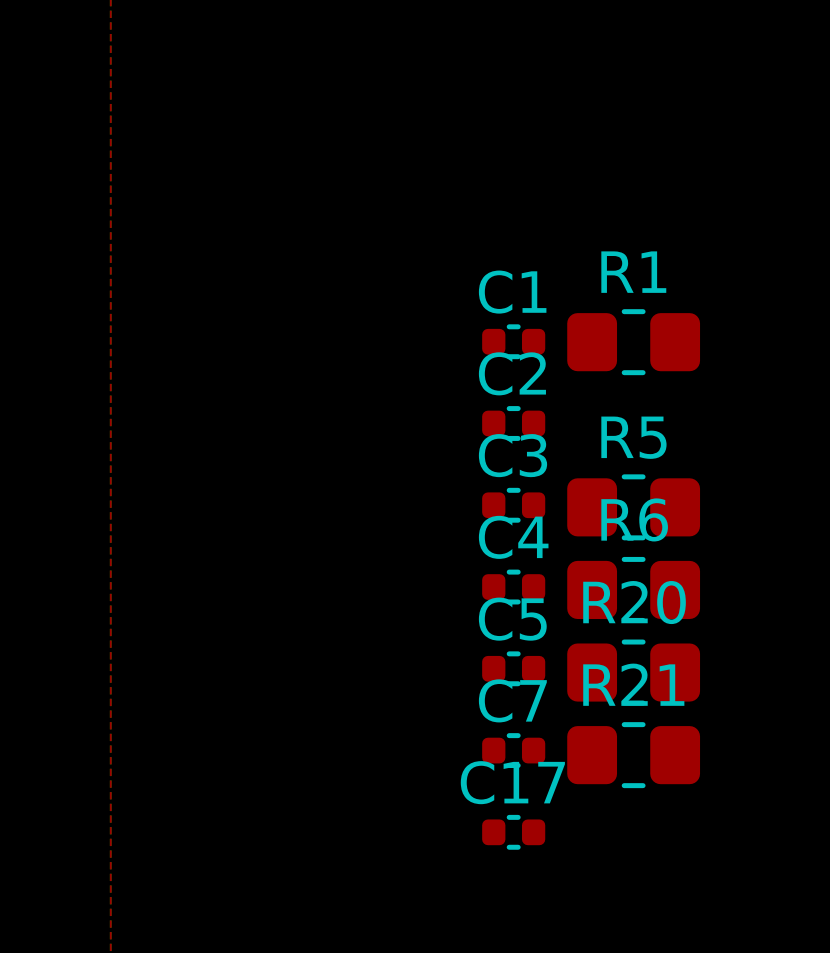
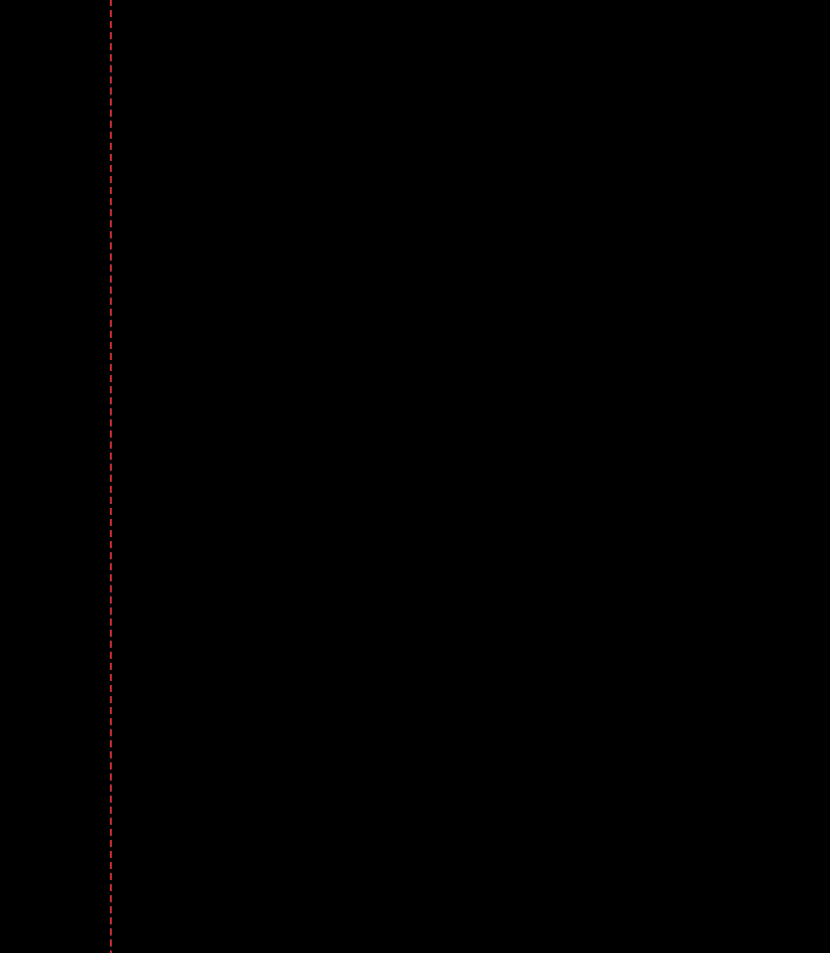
C1: (513, 341) -> none
R1: (633, 342) -> none
C2: (513, 423) -> none
C3: (513, 505) -> none
R5: (633, 507) -> none
C4: (513, 587) -> none
R6: (633, 589) -> none
C5: (513, 668) -> none
R20: (633, 672) -> none
C7: (513, 750) -> none
R21: (633, 755) -> none
C17: (513, 832) -> none

